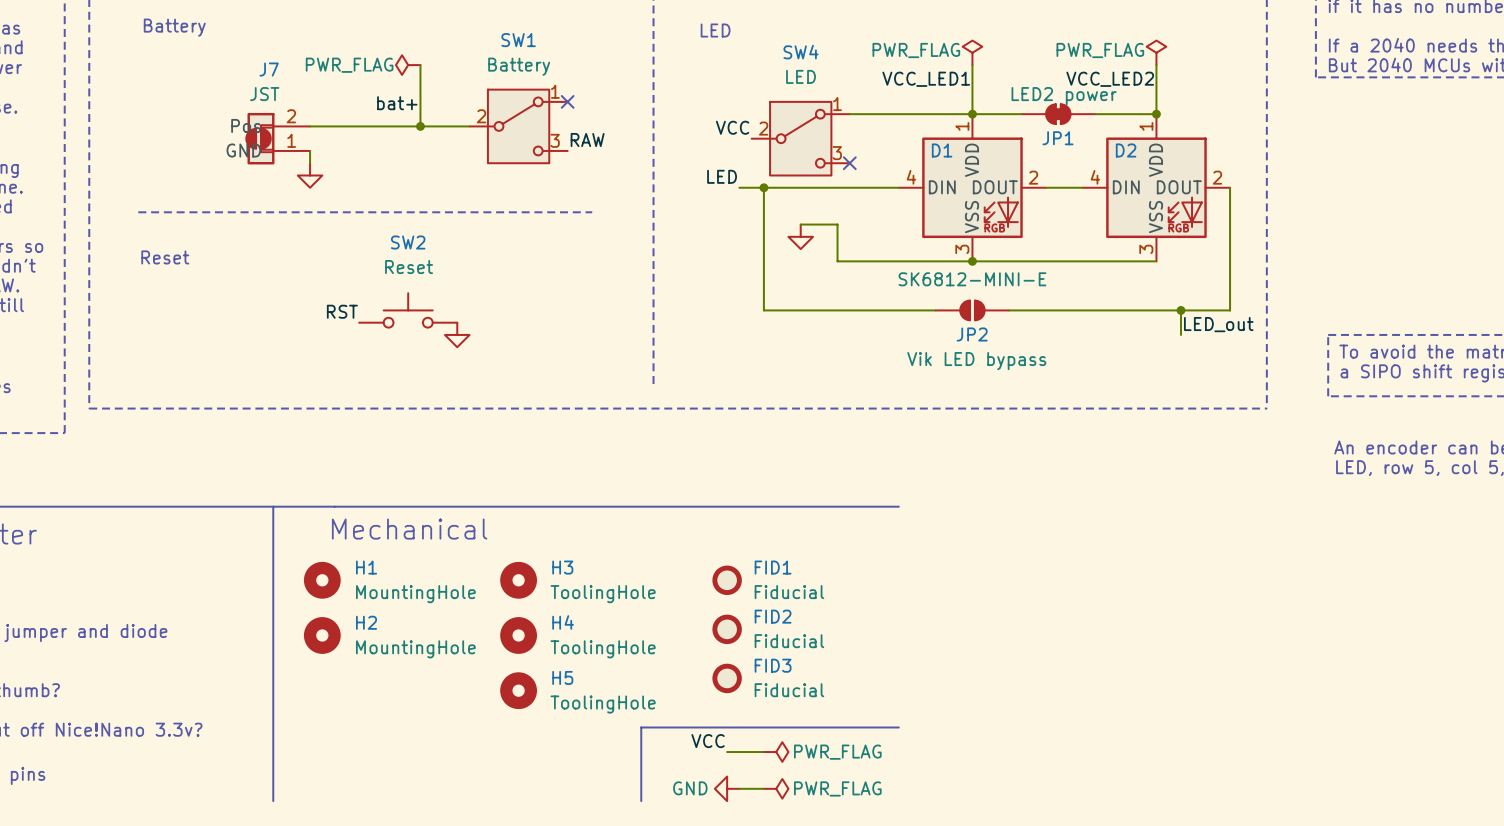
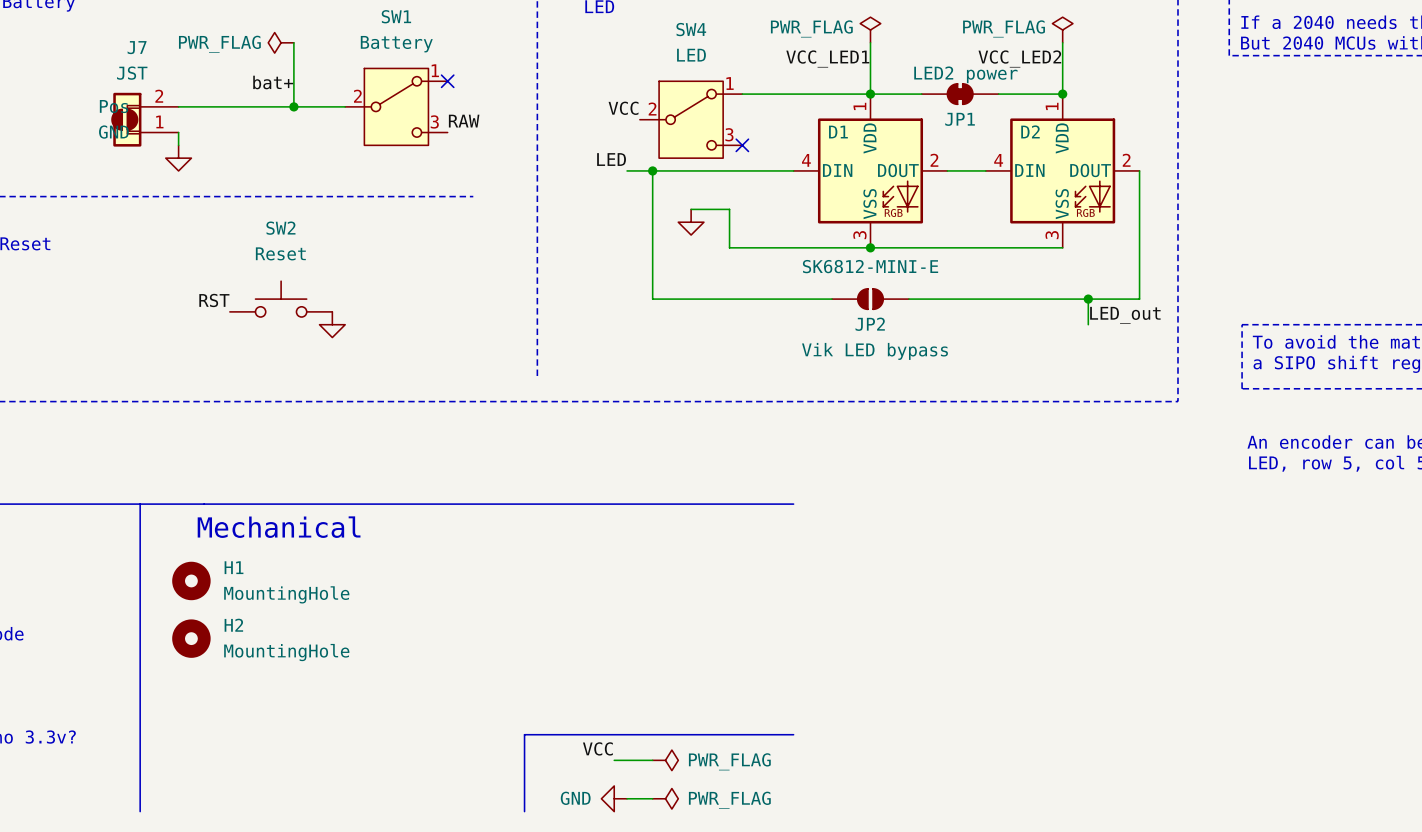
H3: ToolingHole (518, 580) -> none
FID1: Fiducial (727, 580) -> none
FID2: Fiducial (727, 629) -> none
H4: ToolingHole (518, 635) -> none
FID3: Fiducial (727, 678) -> none
H5: ToolingHole (518, 690) -> none

